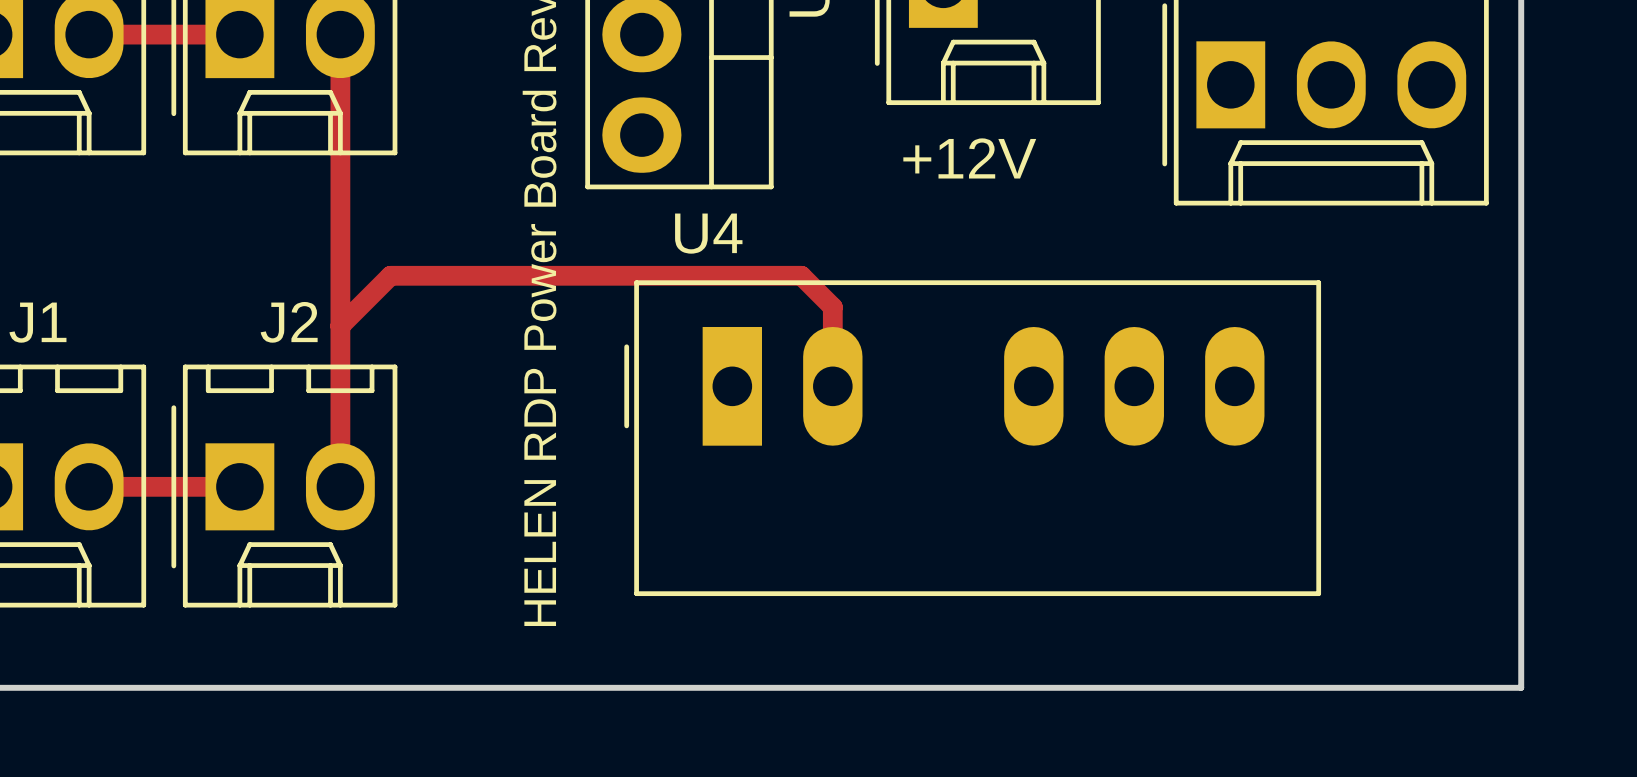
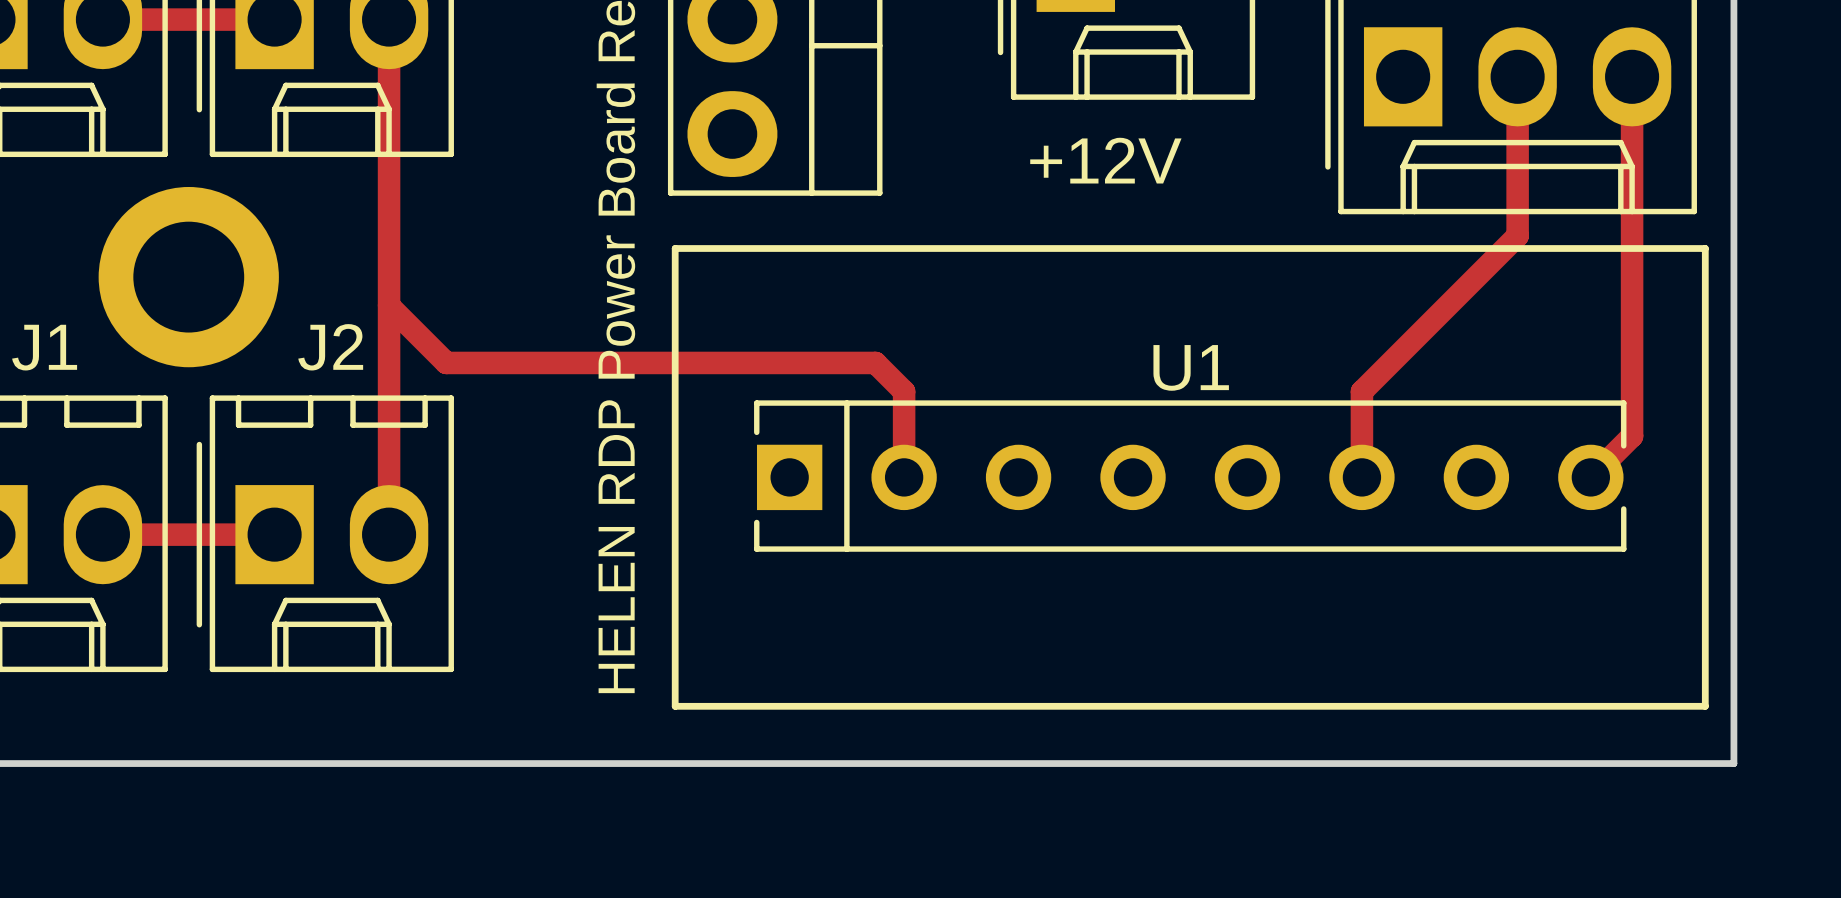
track: none -> (1517, 76) (1517, 235) (1361, 391) (1361, 477)
track: none -> (1632, 76) (1632, 436) (1590, 477)
part: none -> (188, 277)
track: none -> (389, 305) (446, 362) (875, 362) (904, 391) (904, 477)
track: (340, 326) (390, 275) (801, 275) (832, 307) (832, 386) -> none
U1: none -> (1190, 477)
U4: (972, 438) -> none

